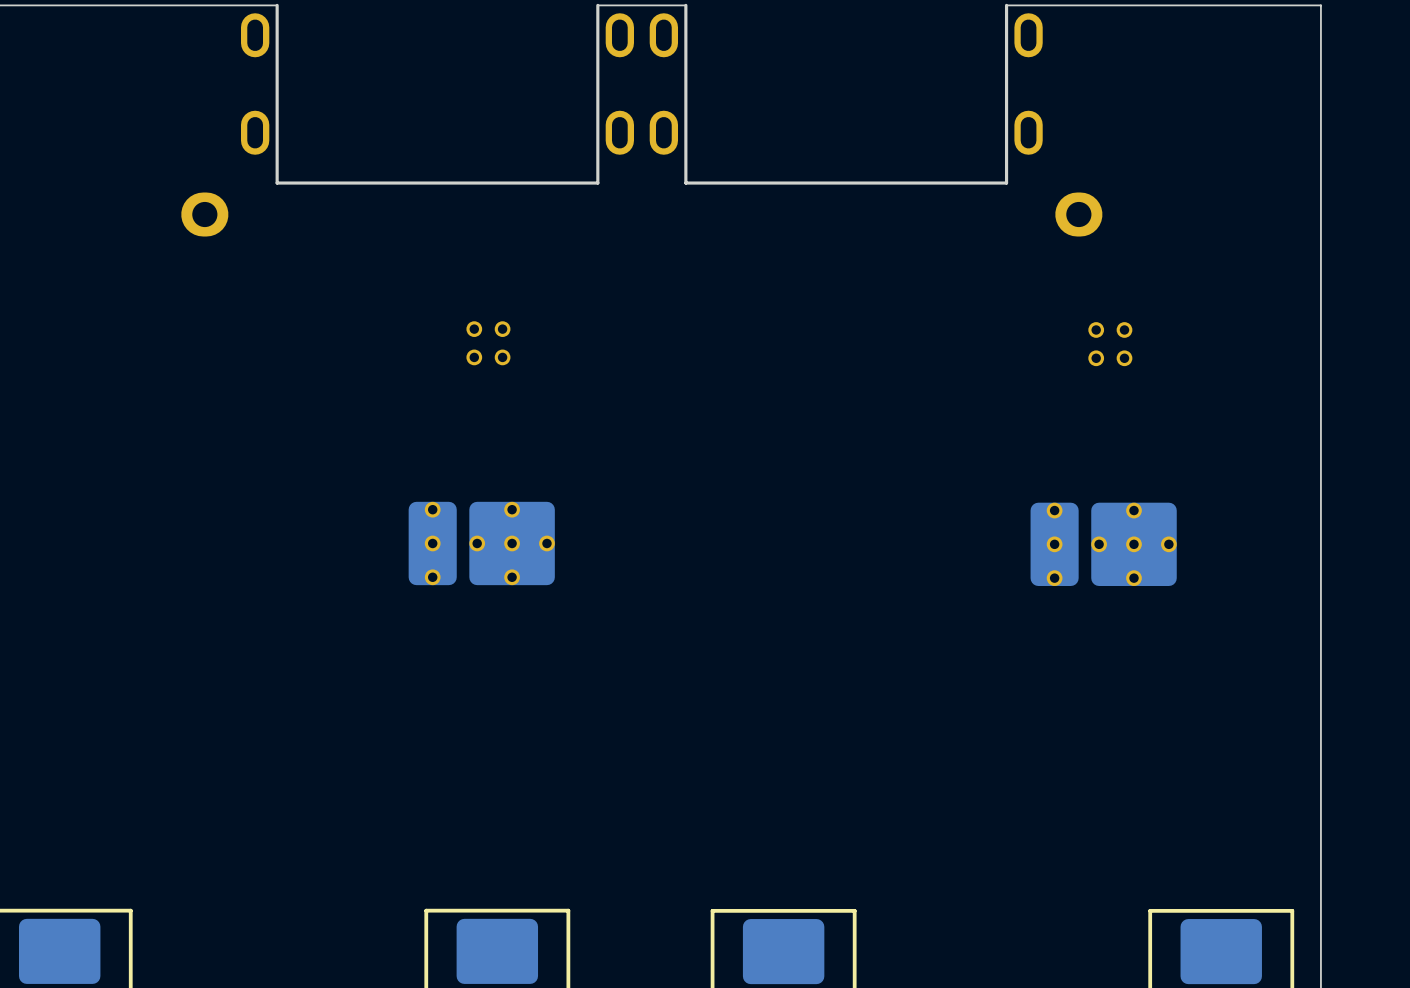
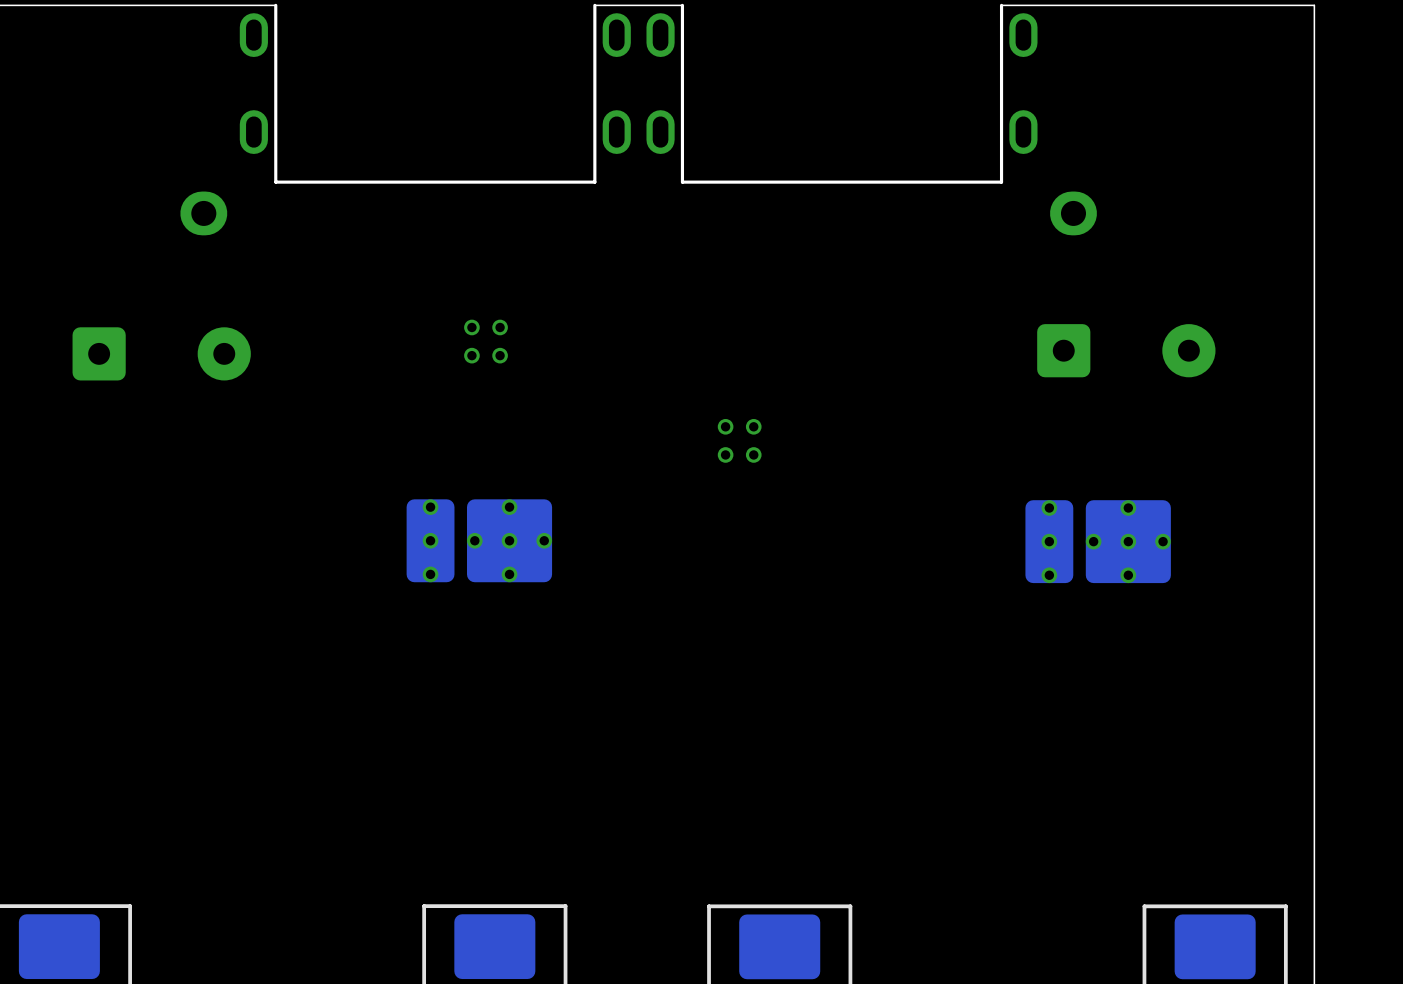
part footprint: [1088, 322, 1133, 367] -> [1037, 324, 1216, 378]
part: none -> (161, 353)
part: none -> (739, 440)

